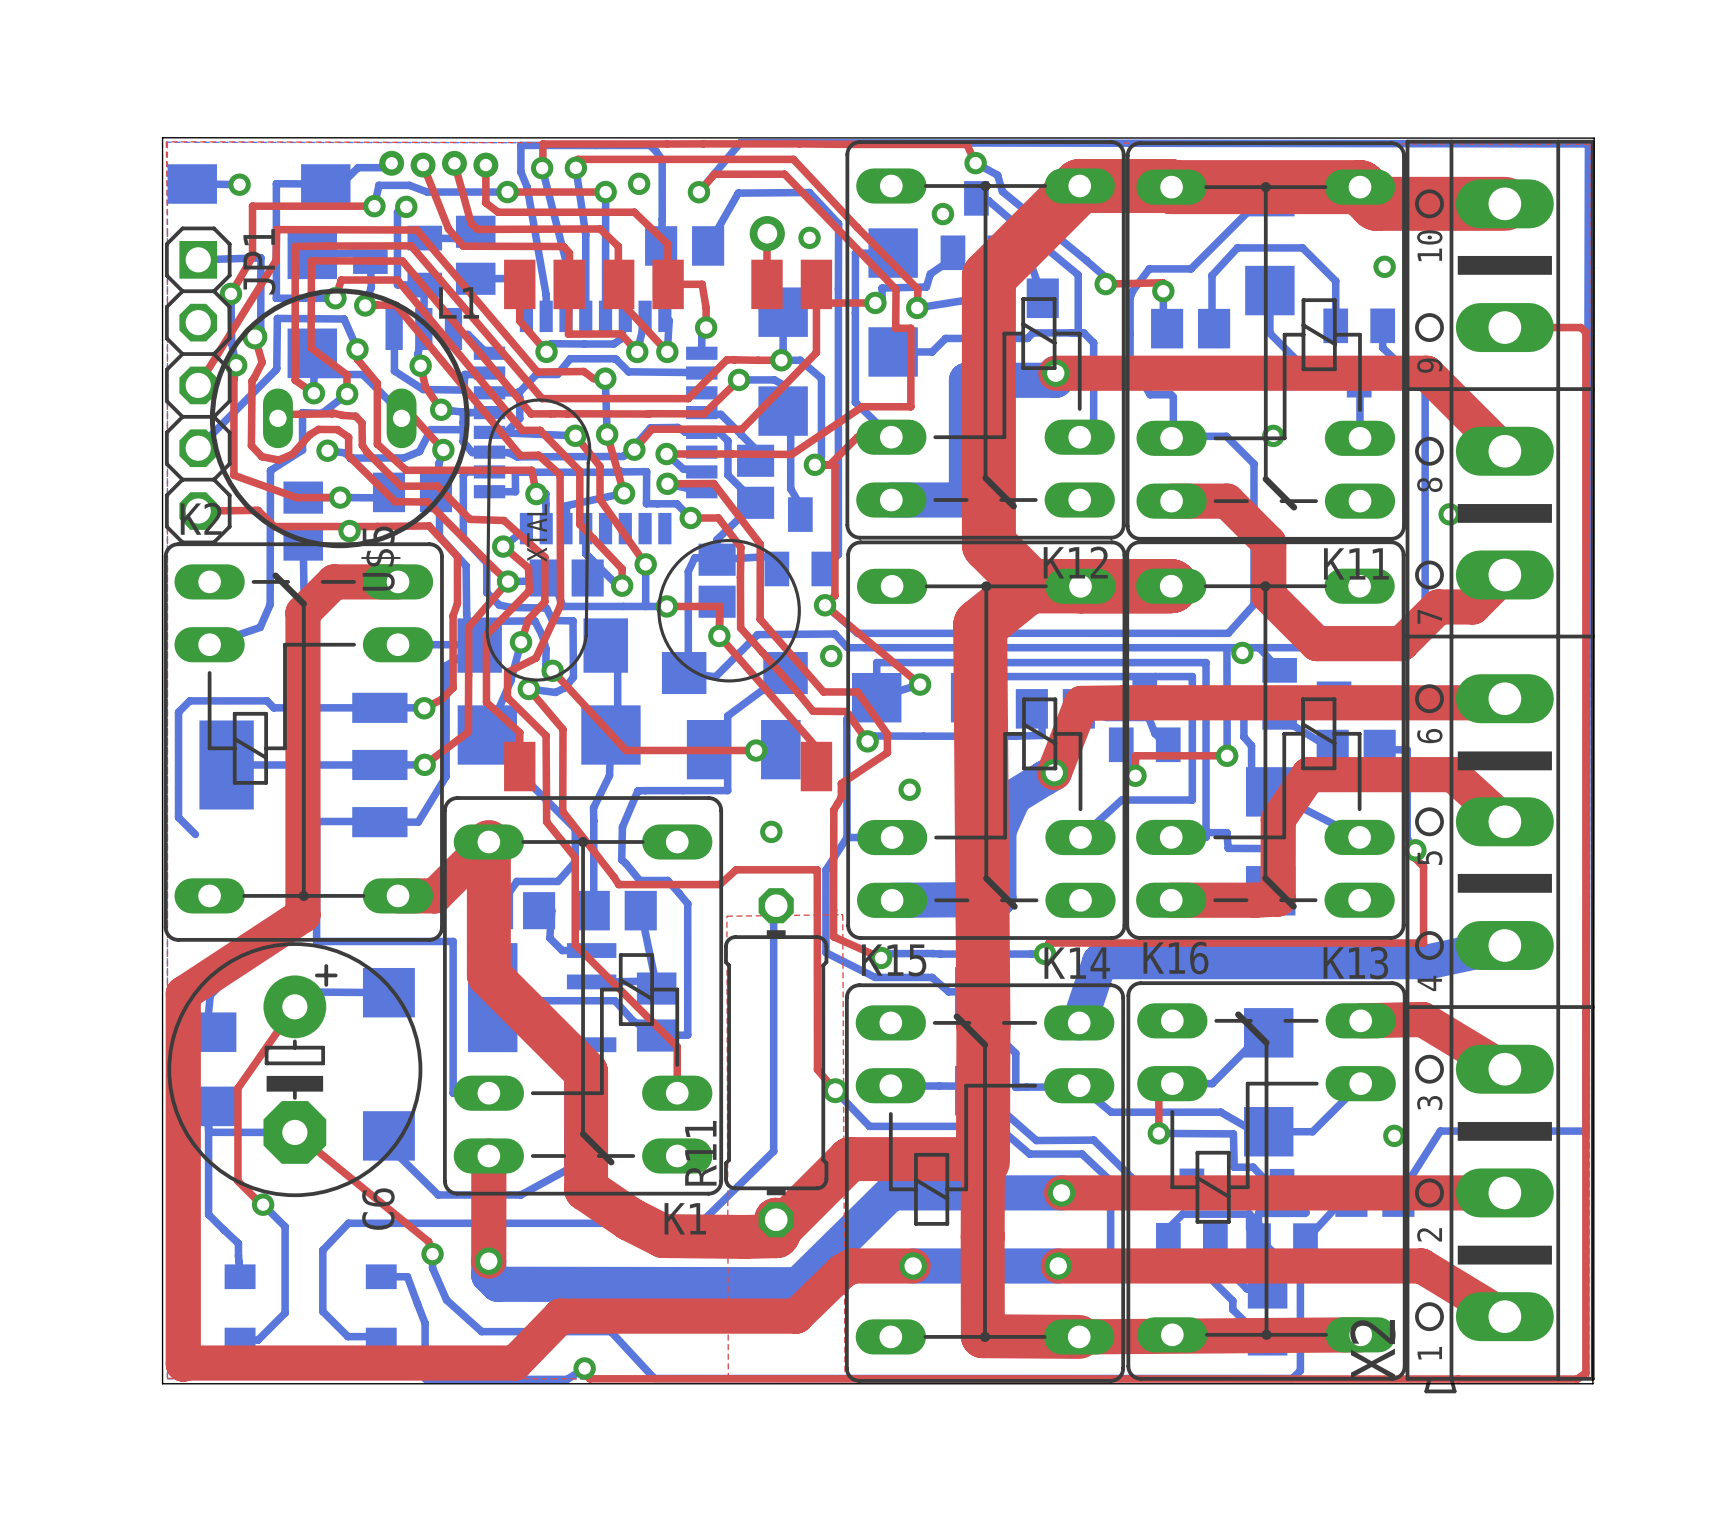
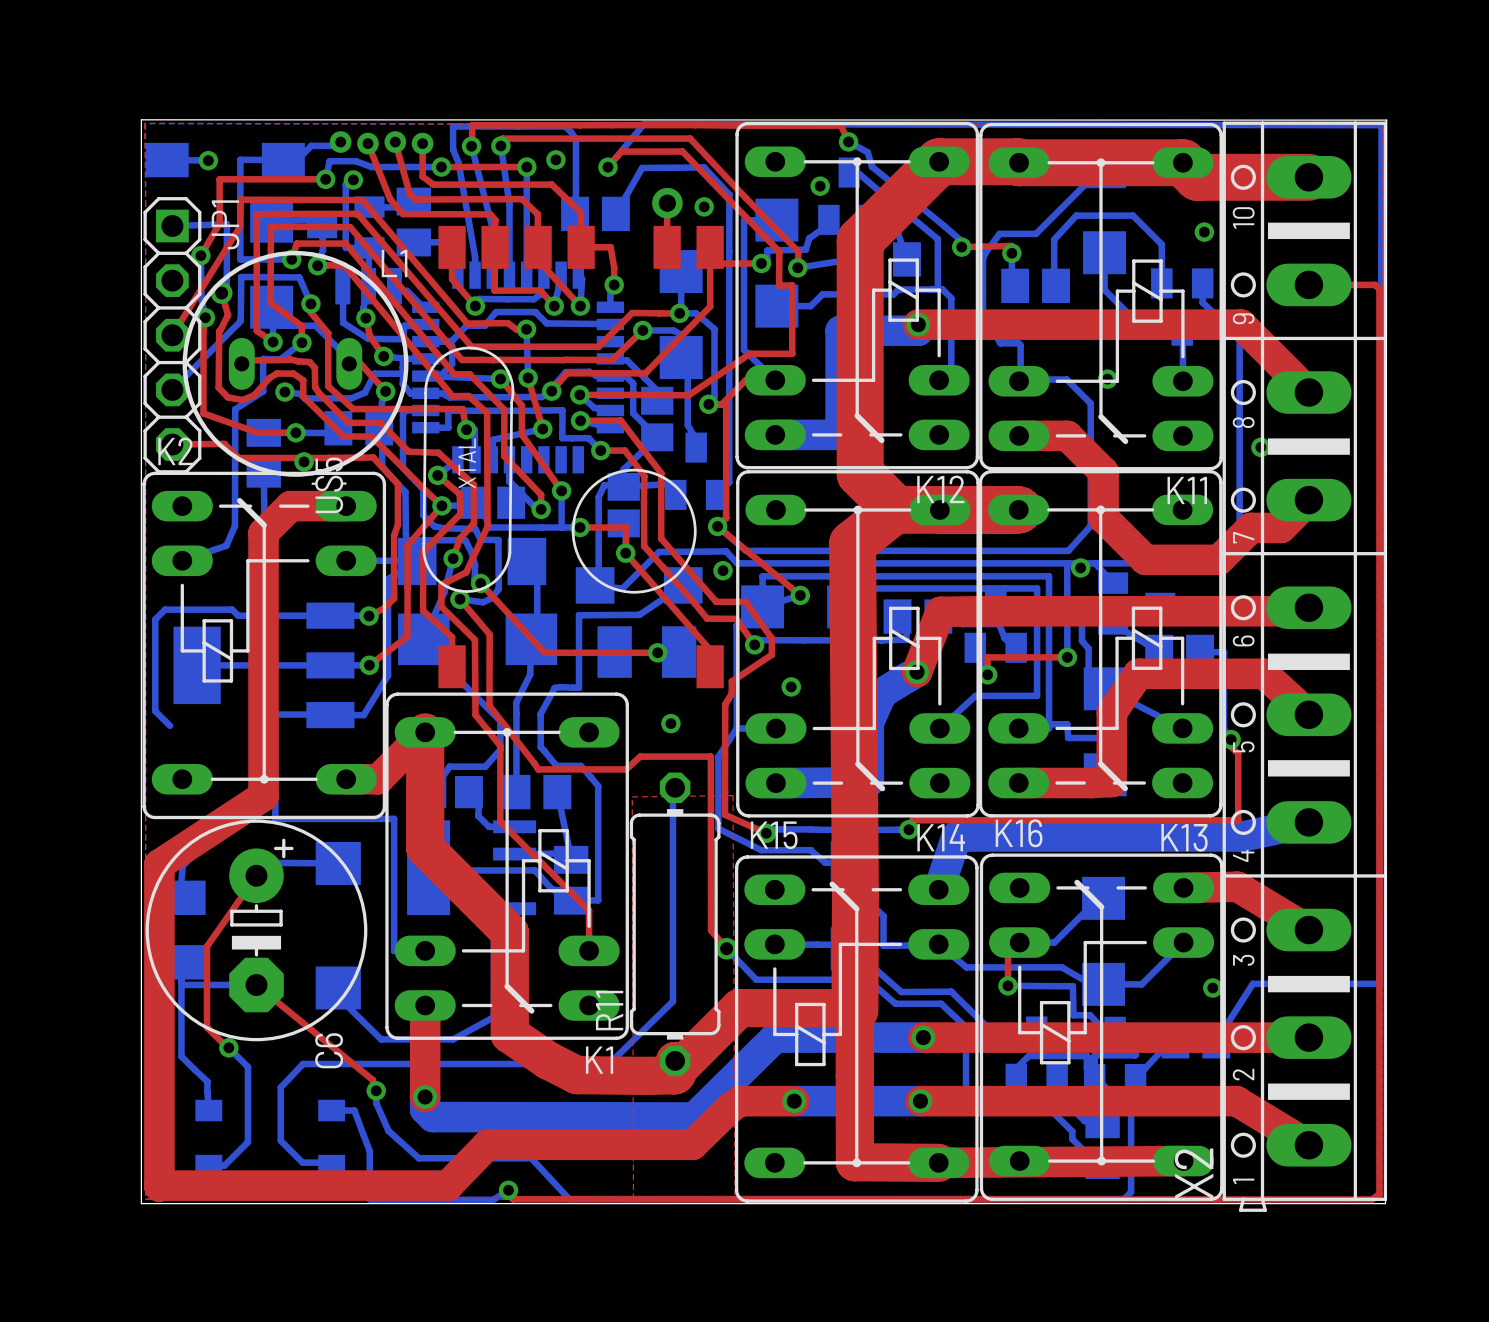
bottom track: (785, 673) (727, 715) (727, 790) (637, 790) (622, 827) (621, 859) (625, 863) -> (683, 585) (639, 614) (579, 615) (579, 687) (554, 687) (540, 714) (540, 747) (544, 751)

